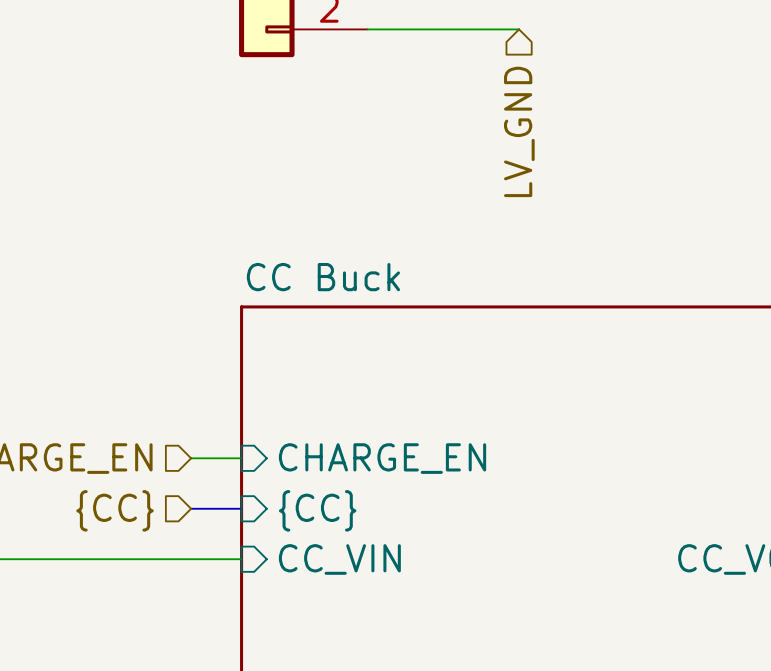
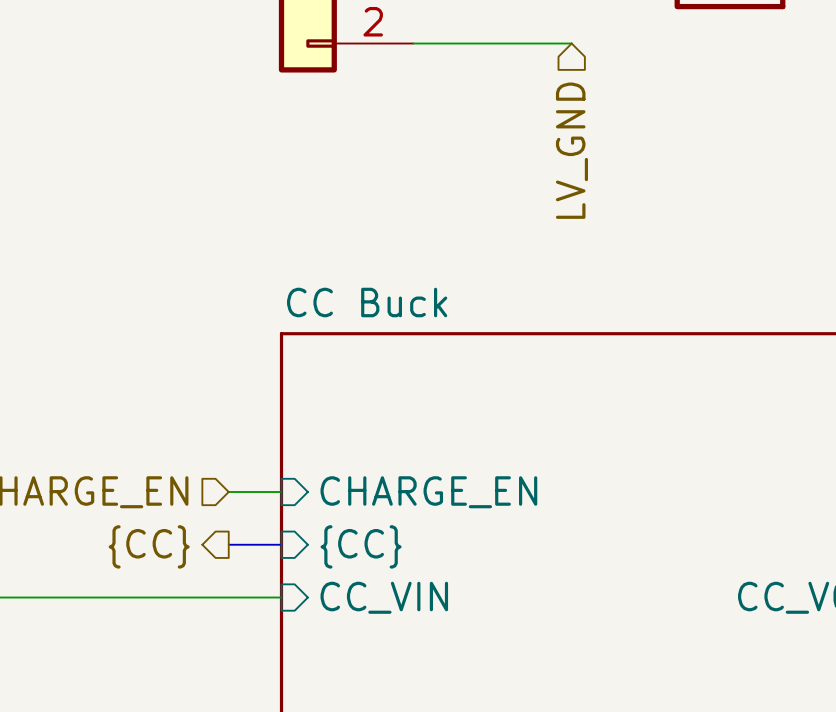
hierarchical label shape: input (115, 510) -> output (149, 546)

